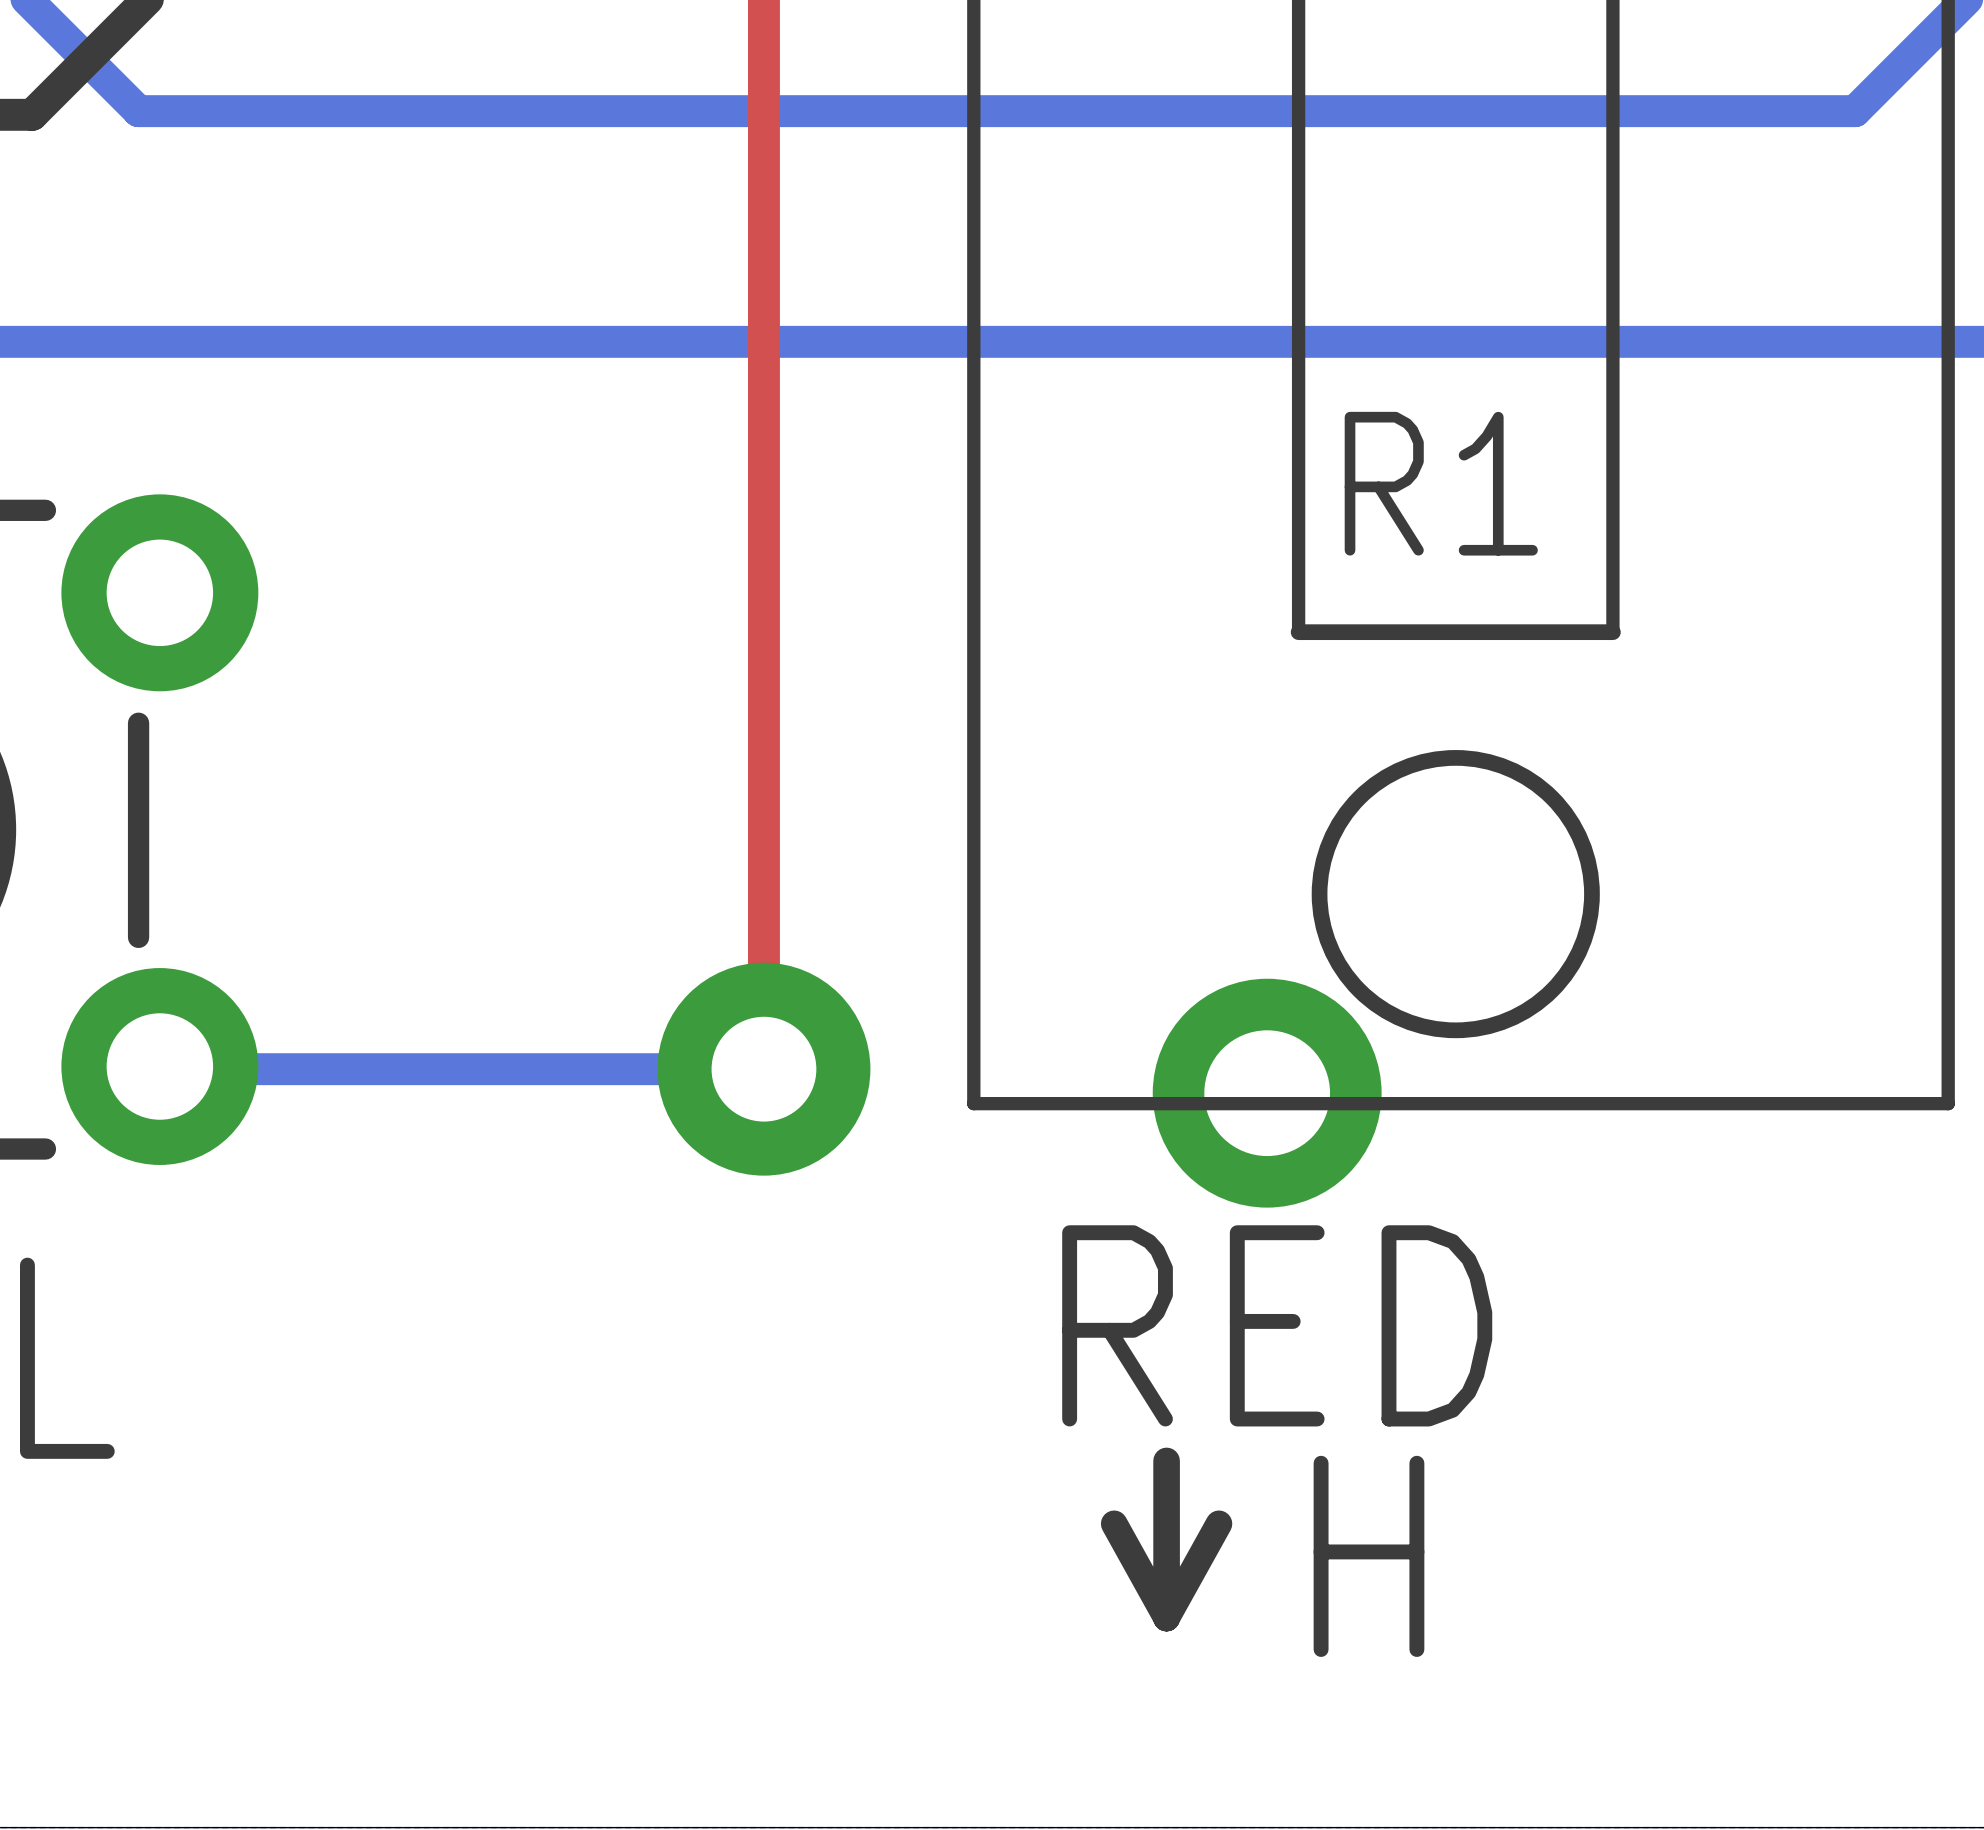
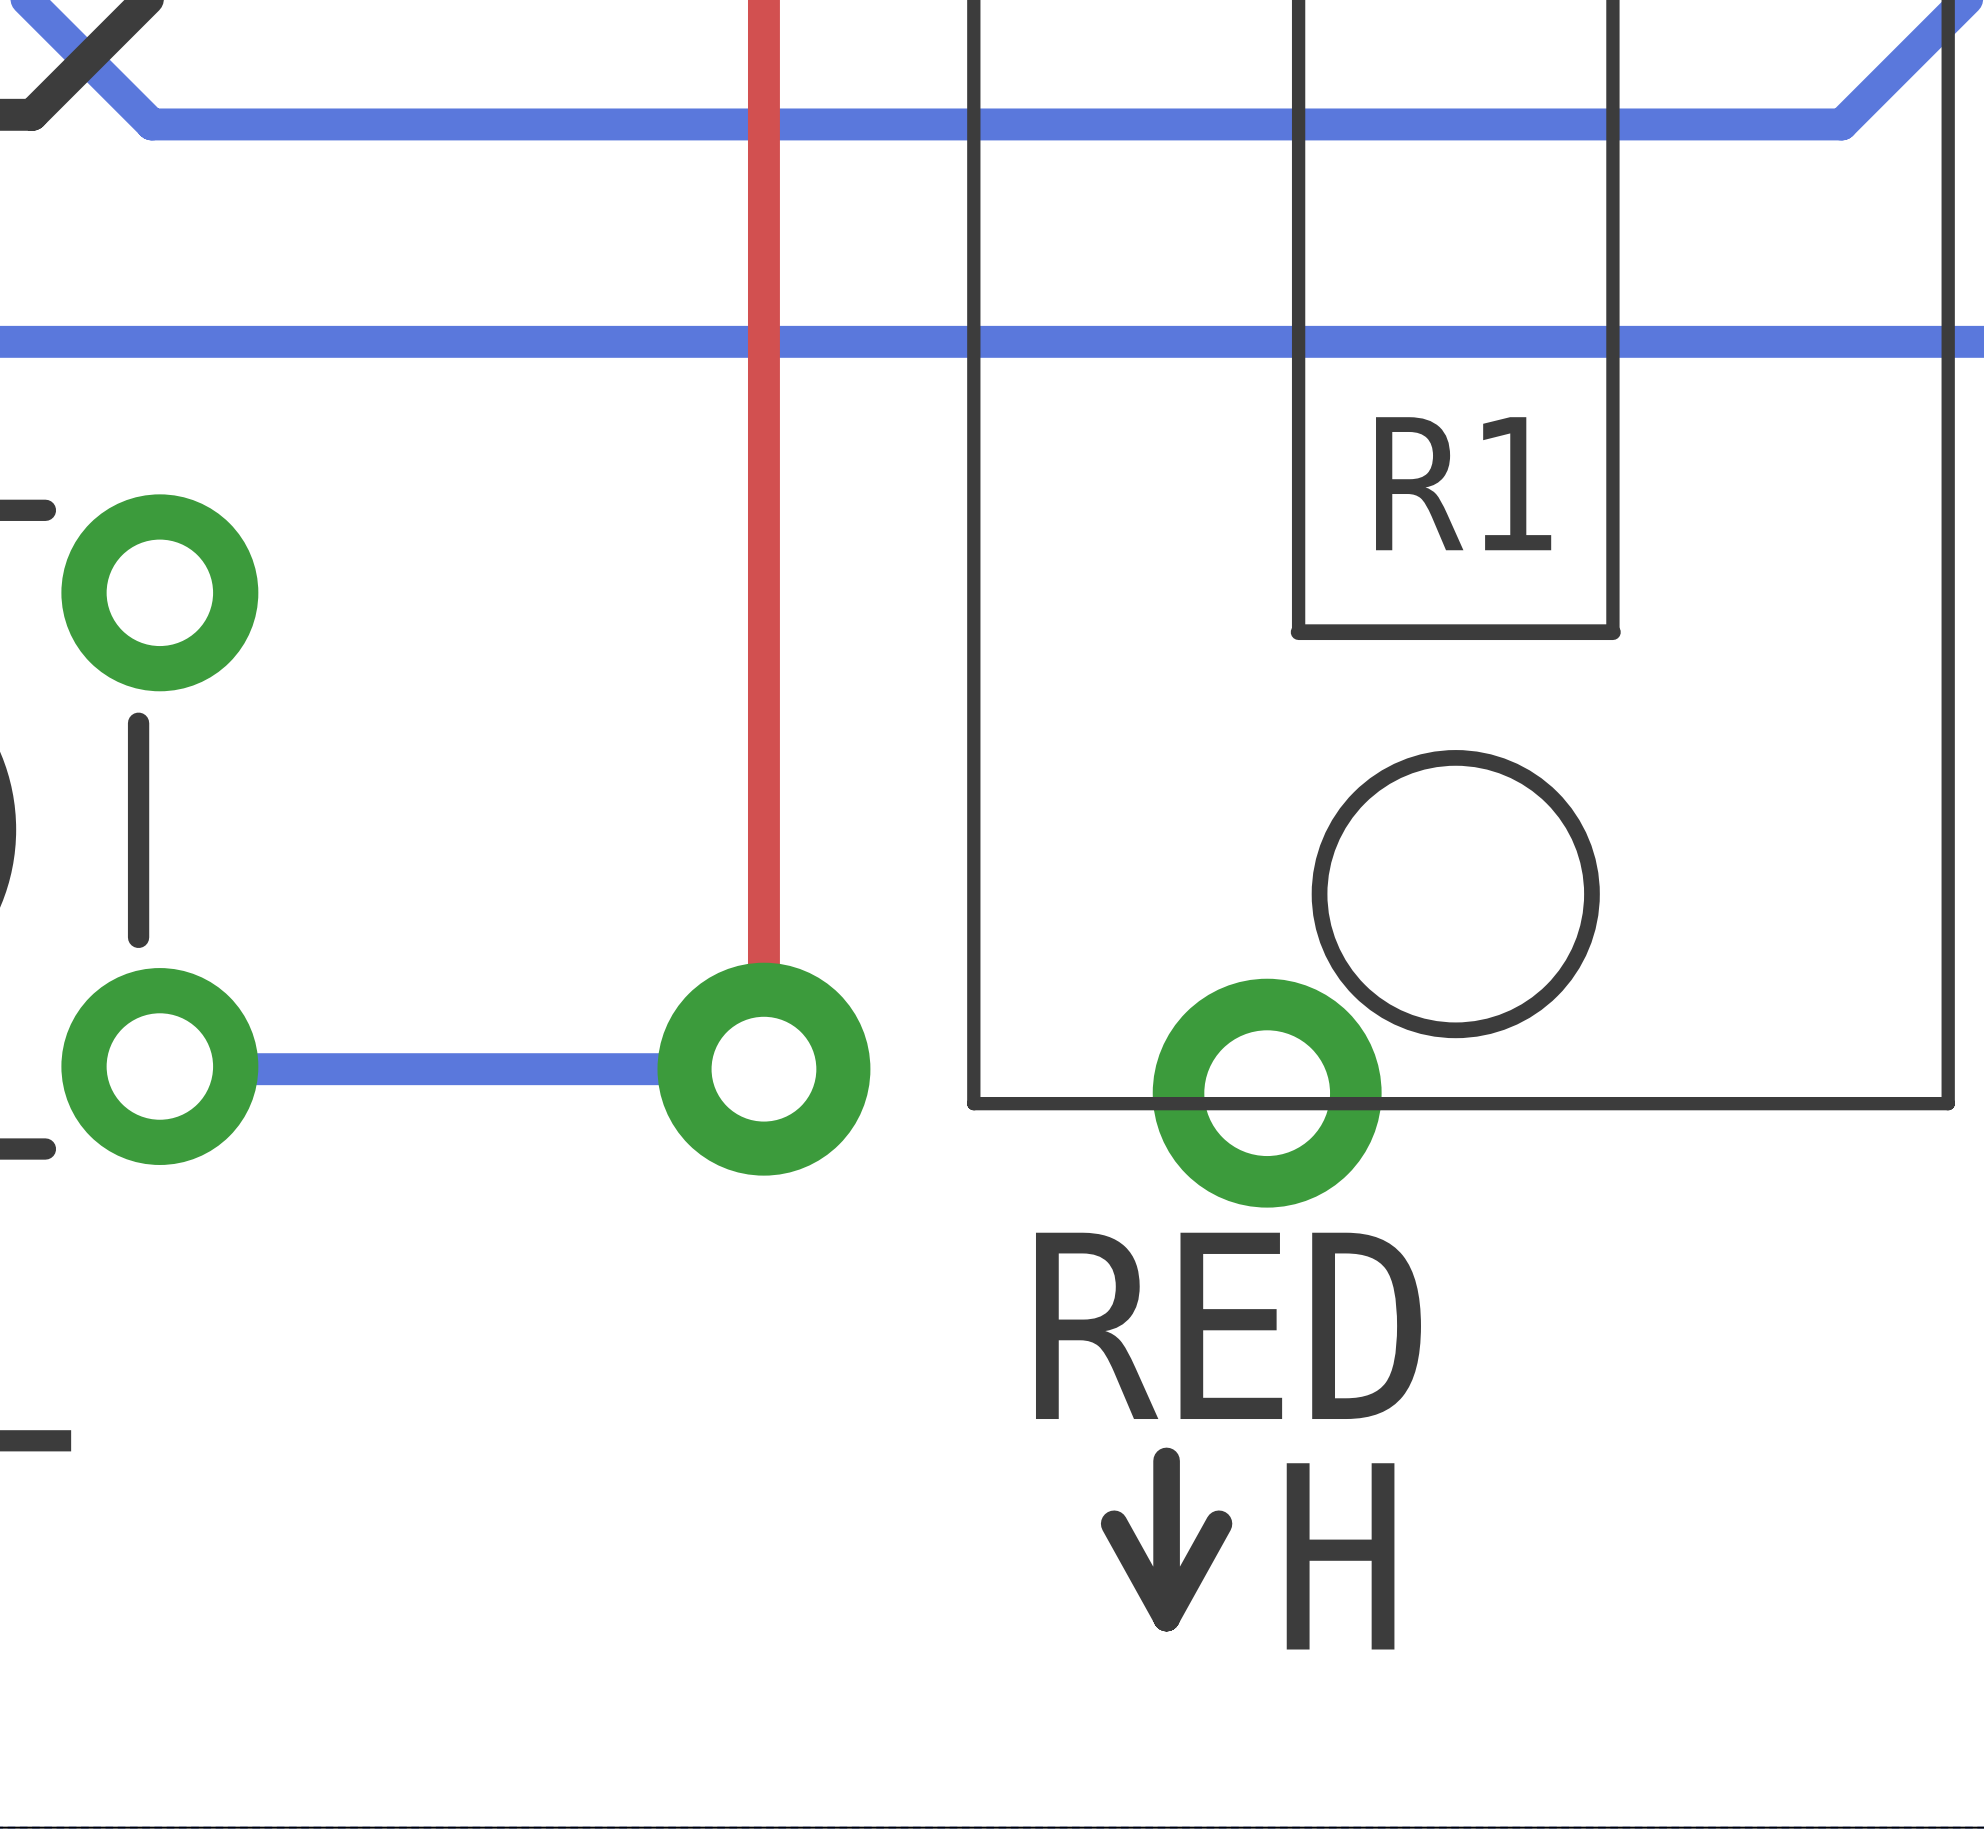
bottom track: (138, 111) (1855, 111) -> (138, 111) (151, 124) (1841, 124) (1855, 111)

